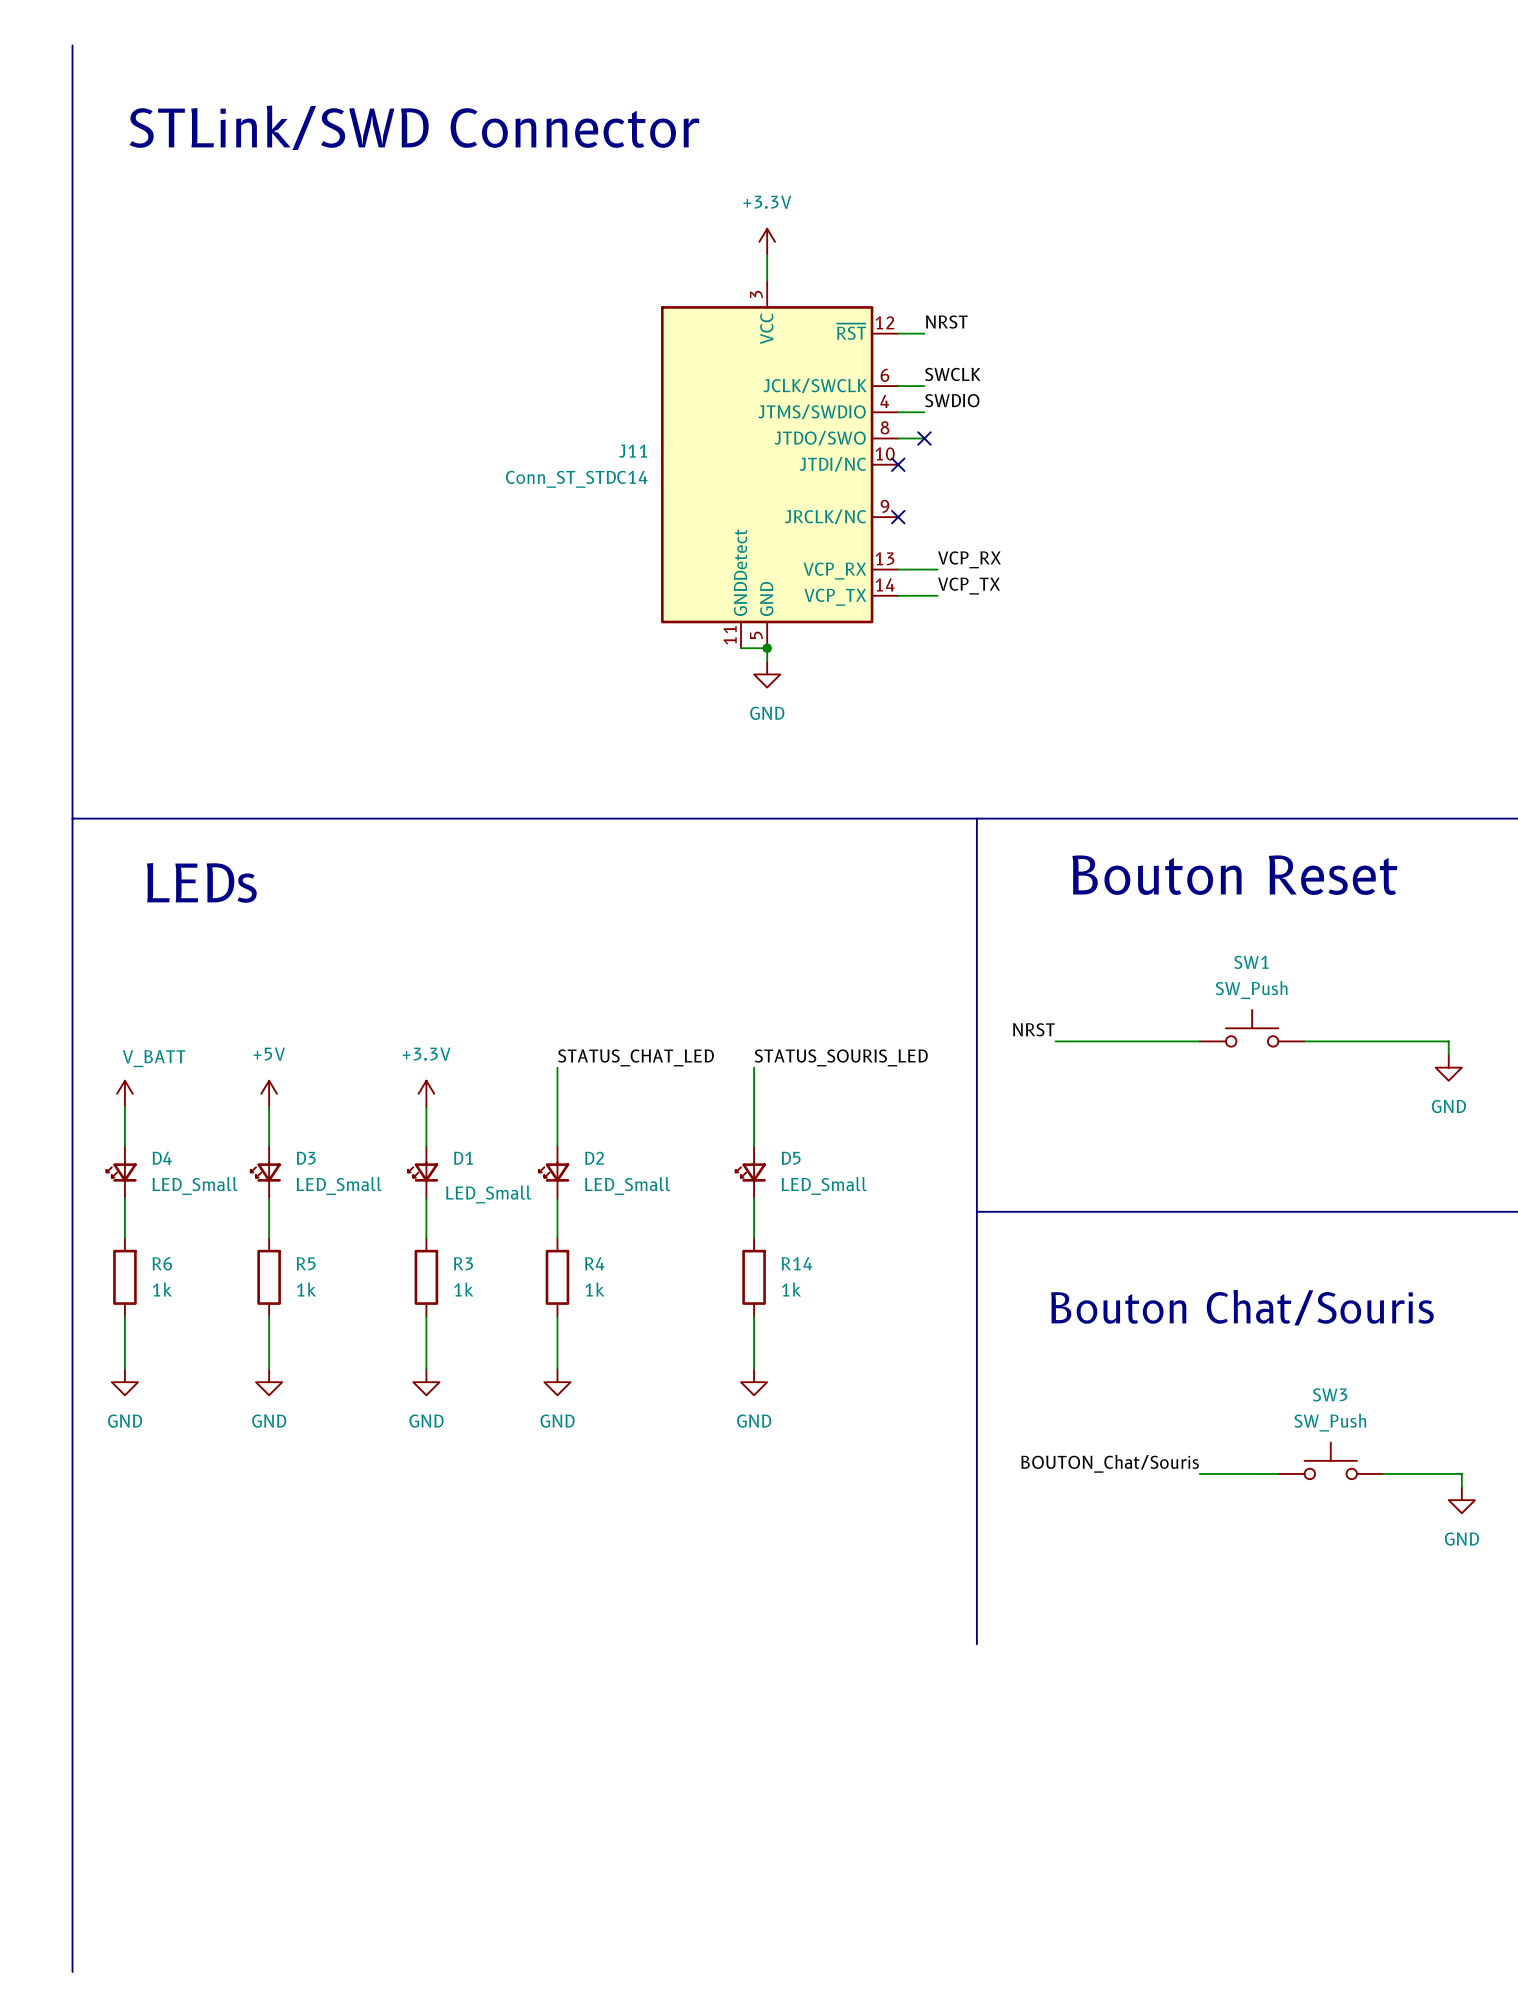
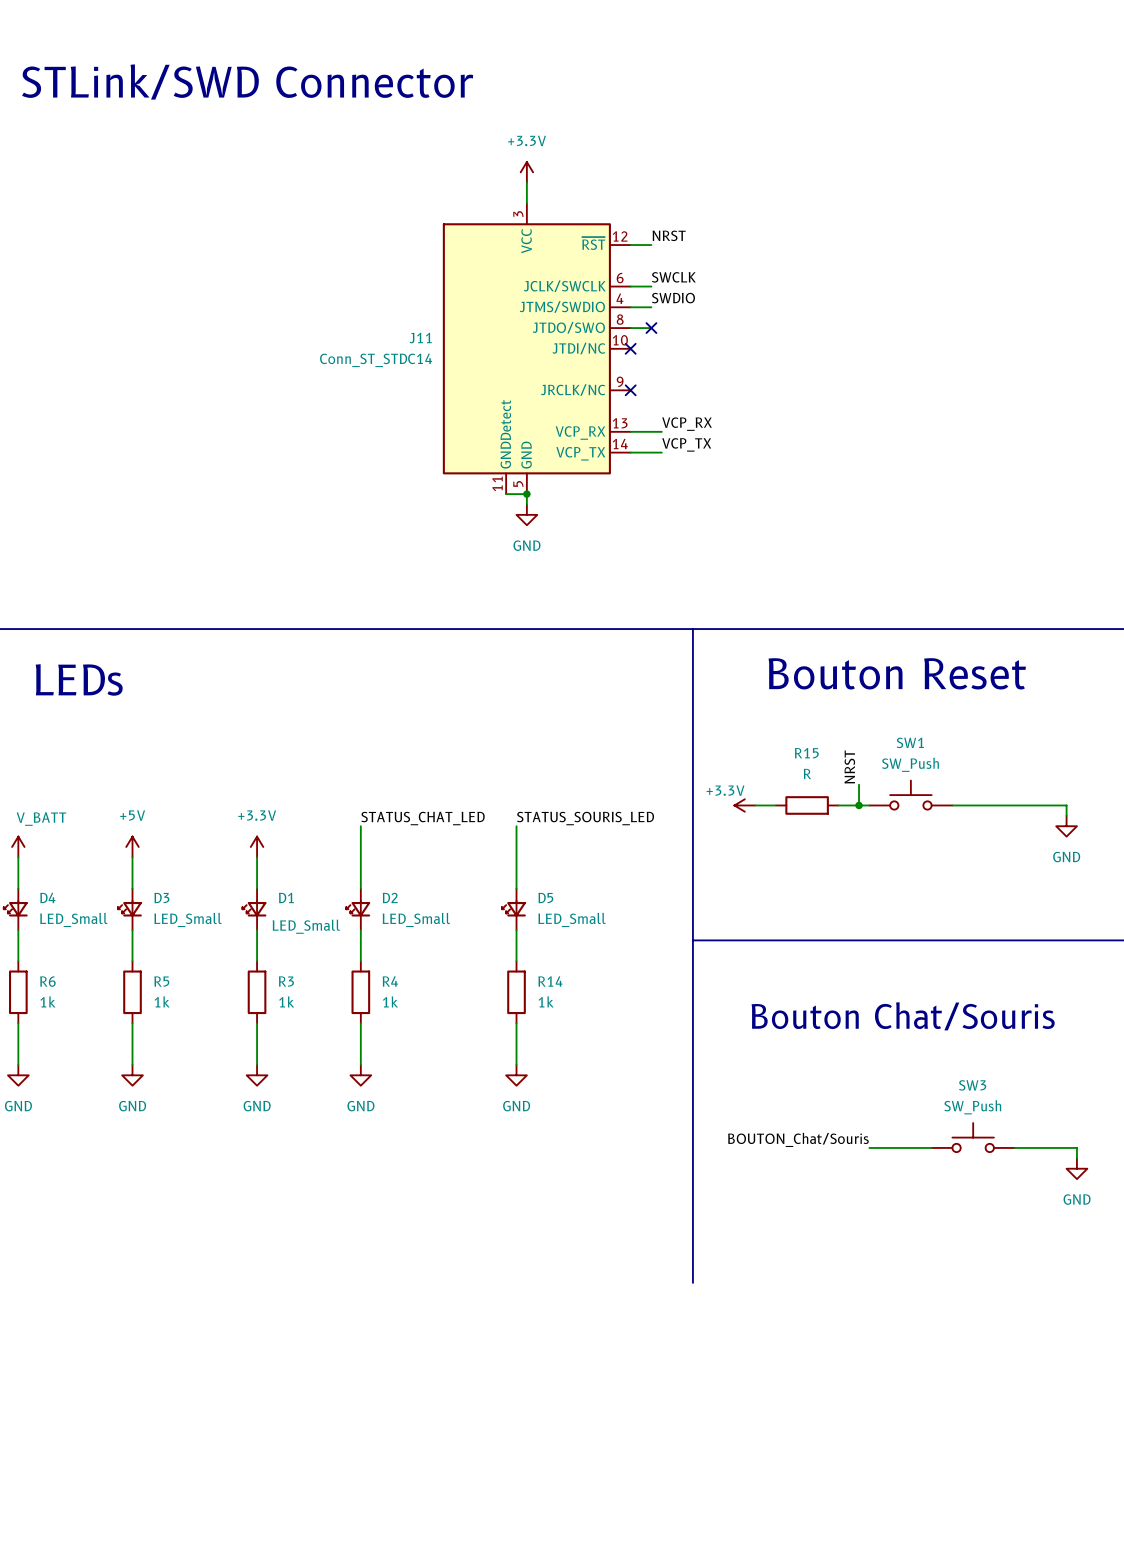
wire: none -> (859, 784) (859, 805)
label rotation: 0° (1033, 1029) -> 90° counterclockwise (849, 767)
label position: NRST (1033, 1029) -> NRST (849, 767)
power symbol: none -> +3.3V (744, 805)
wire: (1081, 1041) (1160, 1041) -> none
R15: none -> R (807, 805)
junction: none -> (859, 805)

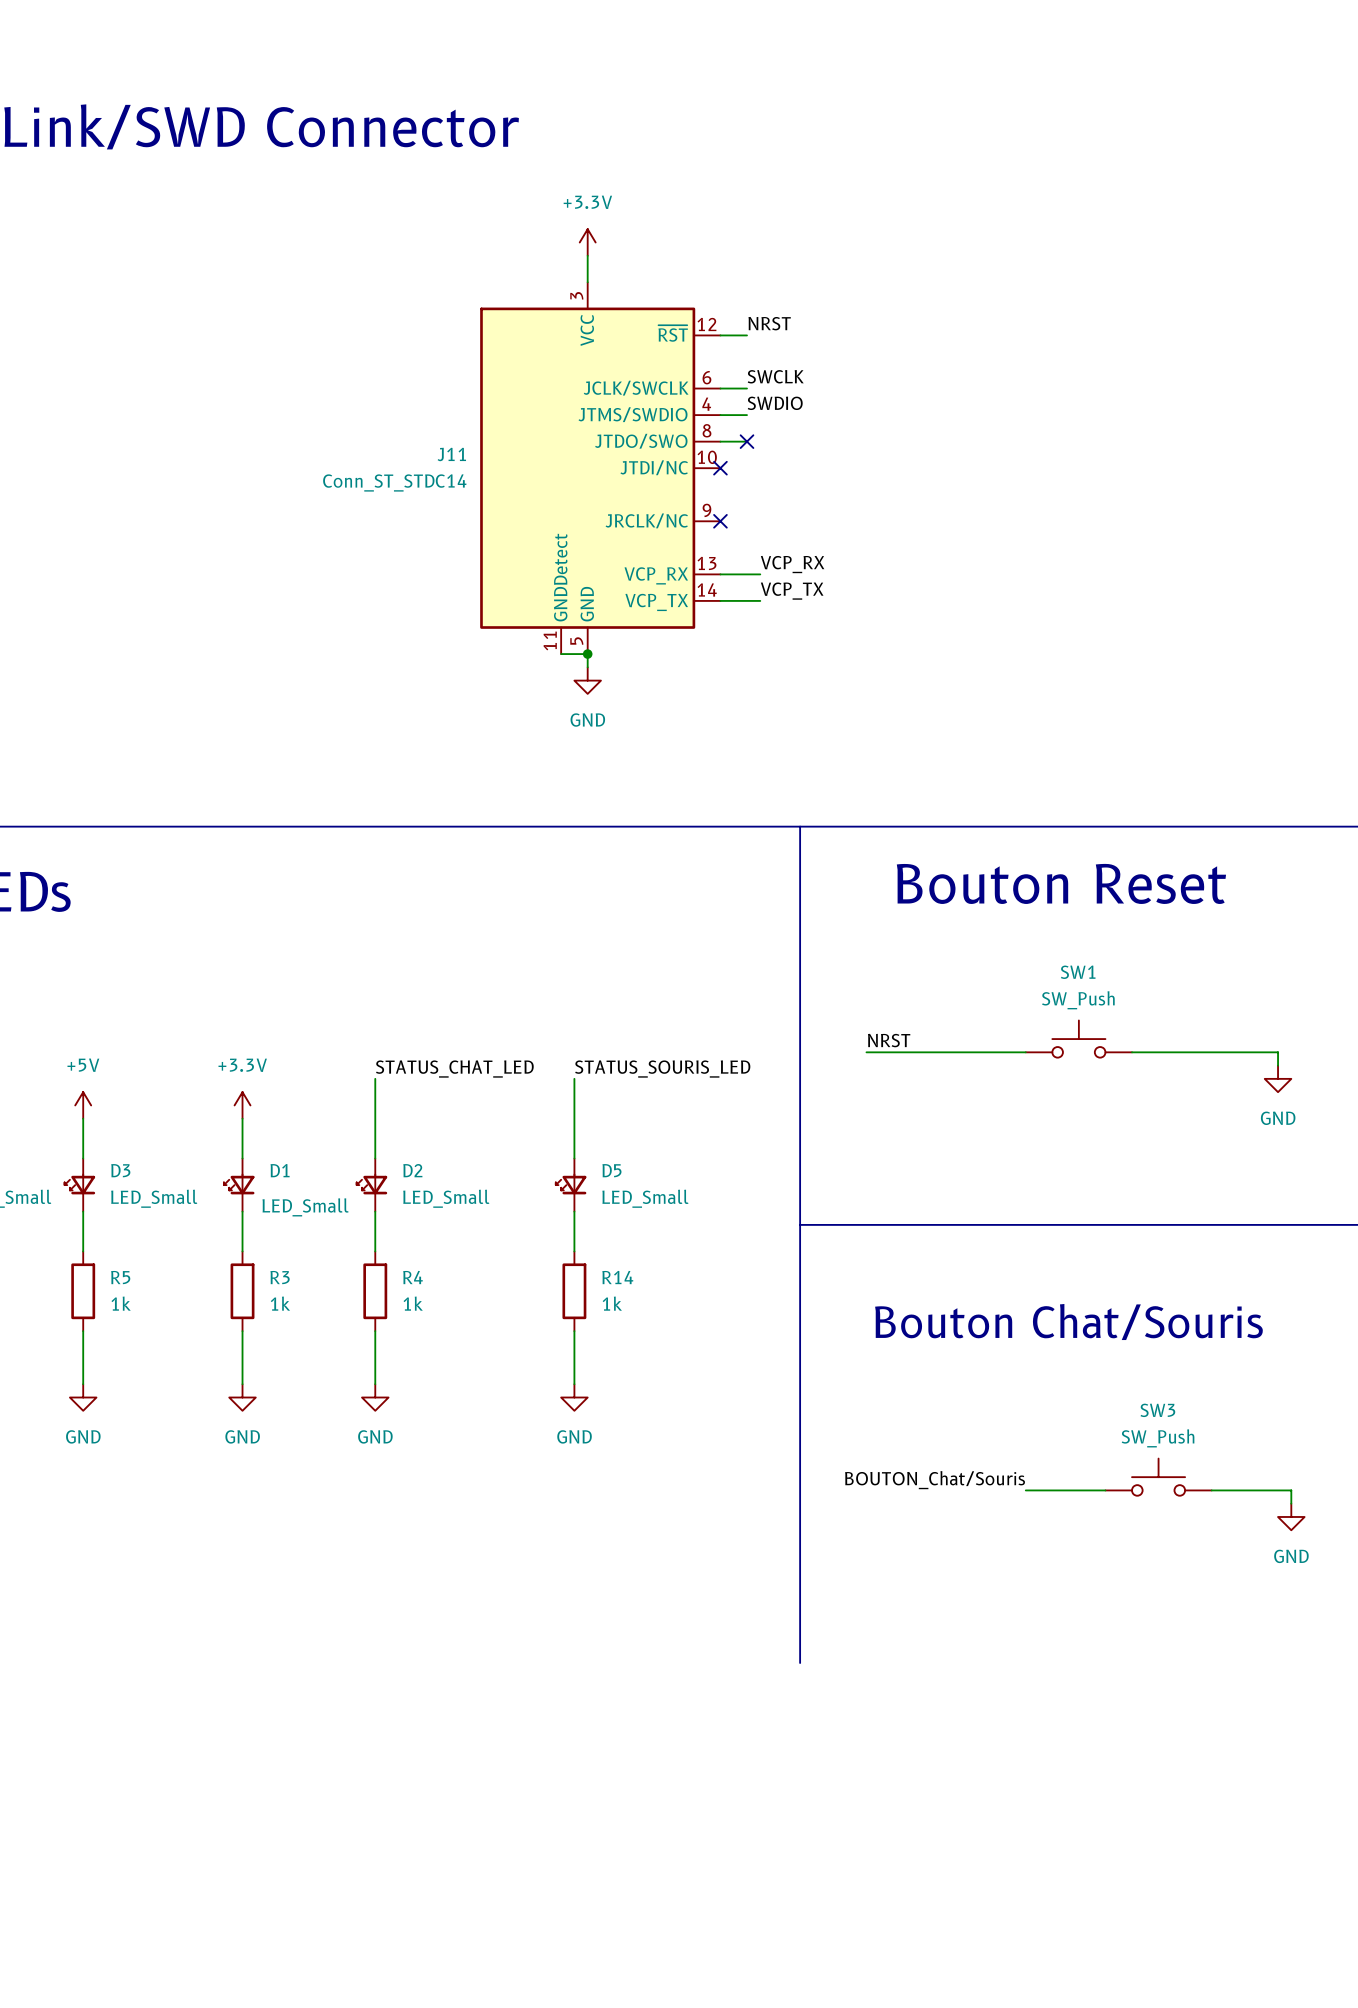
label rotation: 0° (849, 767) -> 90° clockwise (889, 1040)
label position: NRST (849, 767) -> NRST (889, 1040)
wire: (859, 784) (859, 805) -> none
power symbol: +3.3V (744, 805) -> none
wire: none -> (906, 1052) (985, 1052)
R15: R (807, 805) -> none
junction: (859, 805) -> none

